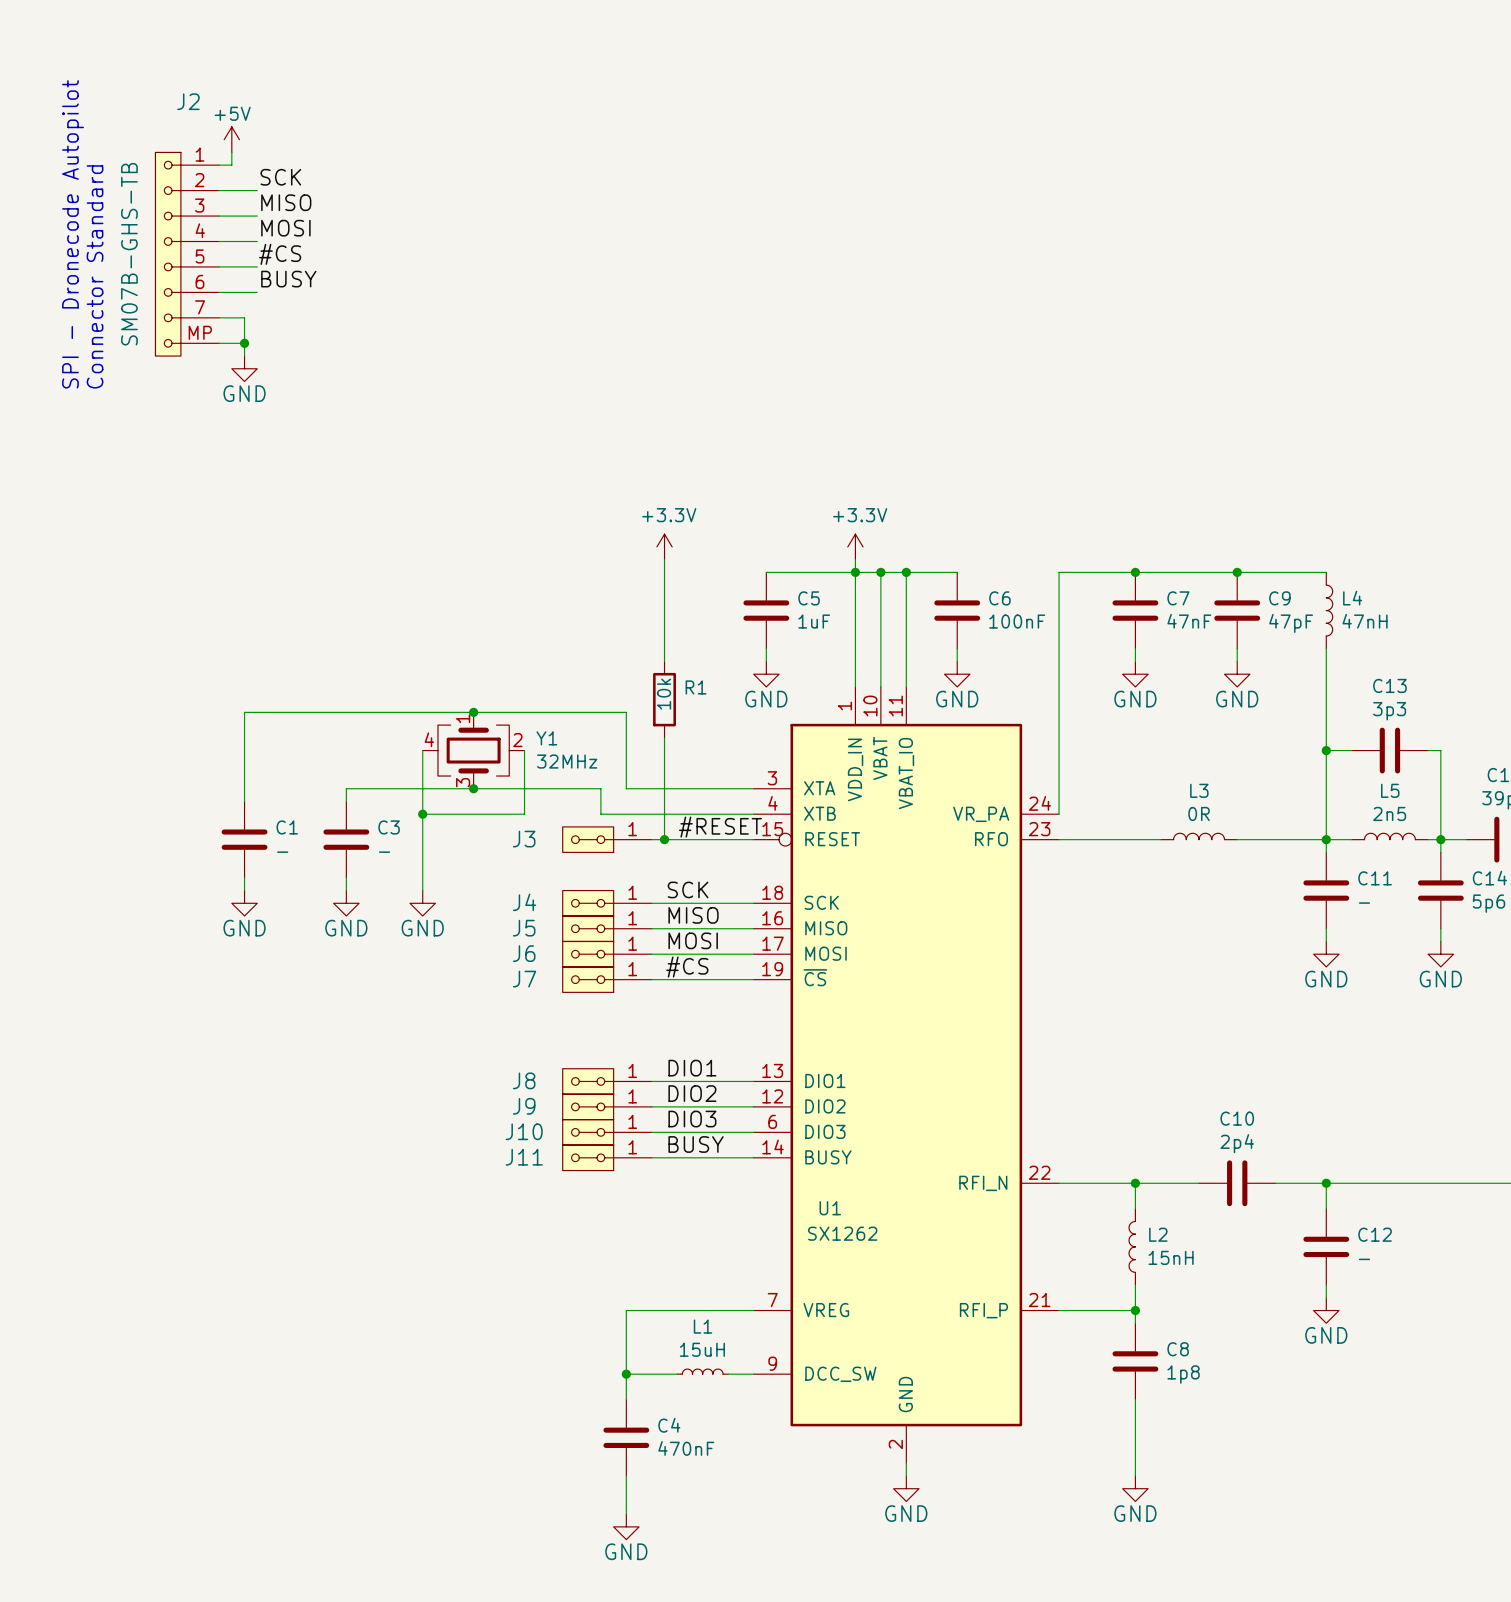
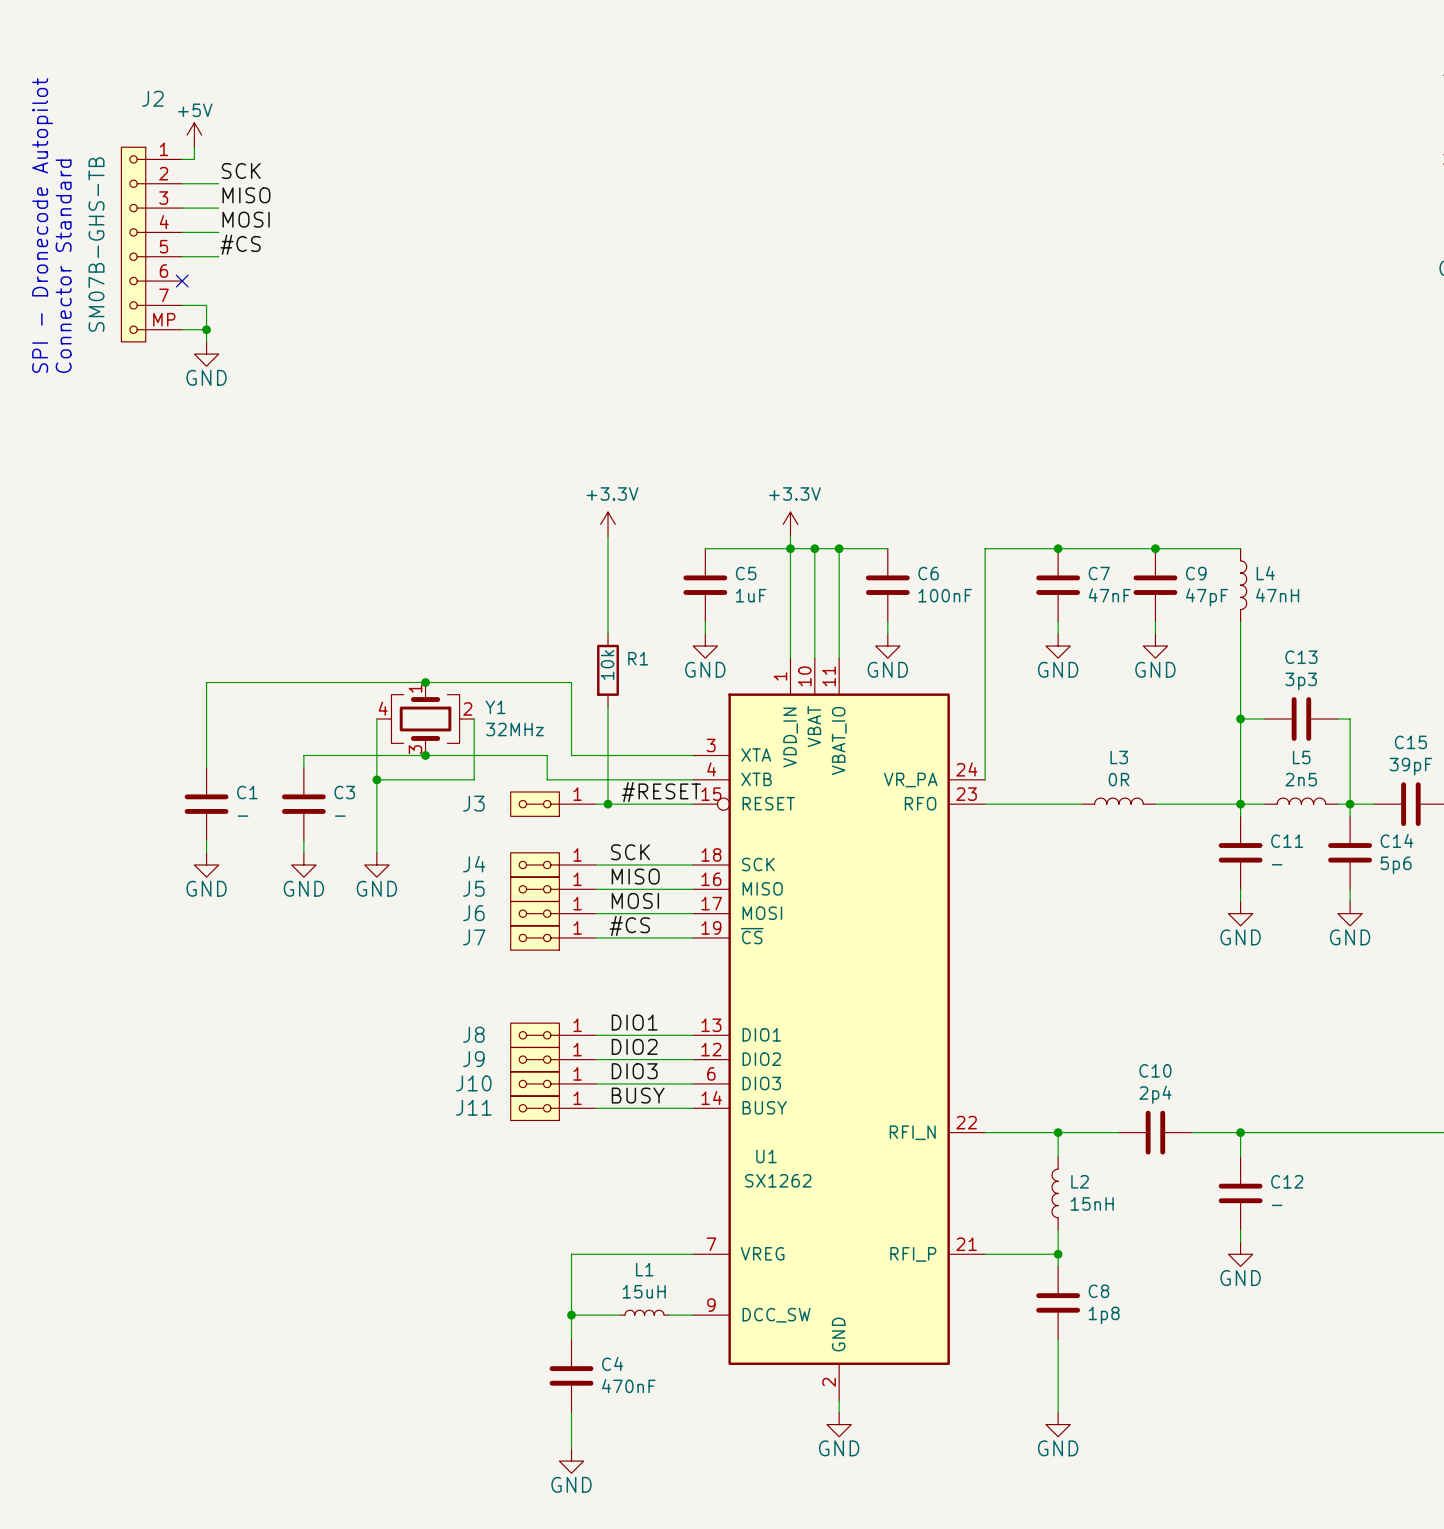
label: BUSY (288, 279) -> none
wire: (219, 292) (257, 292) -> none
no-connect mark: none -> (182, 281)

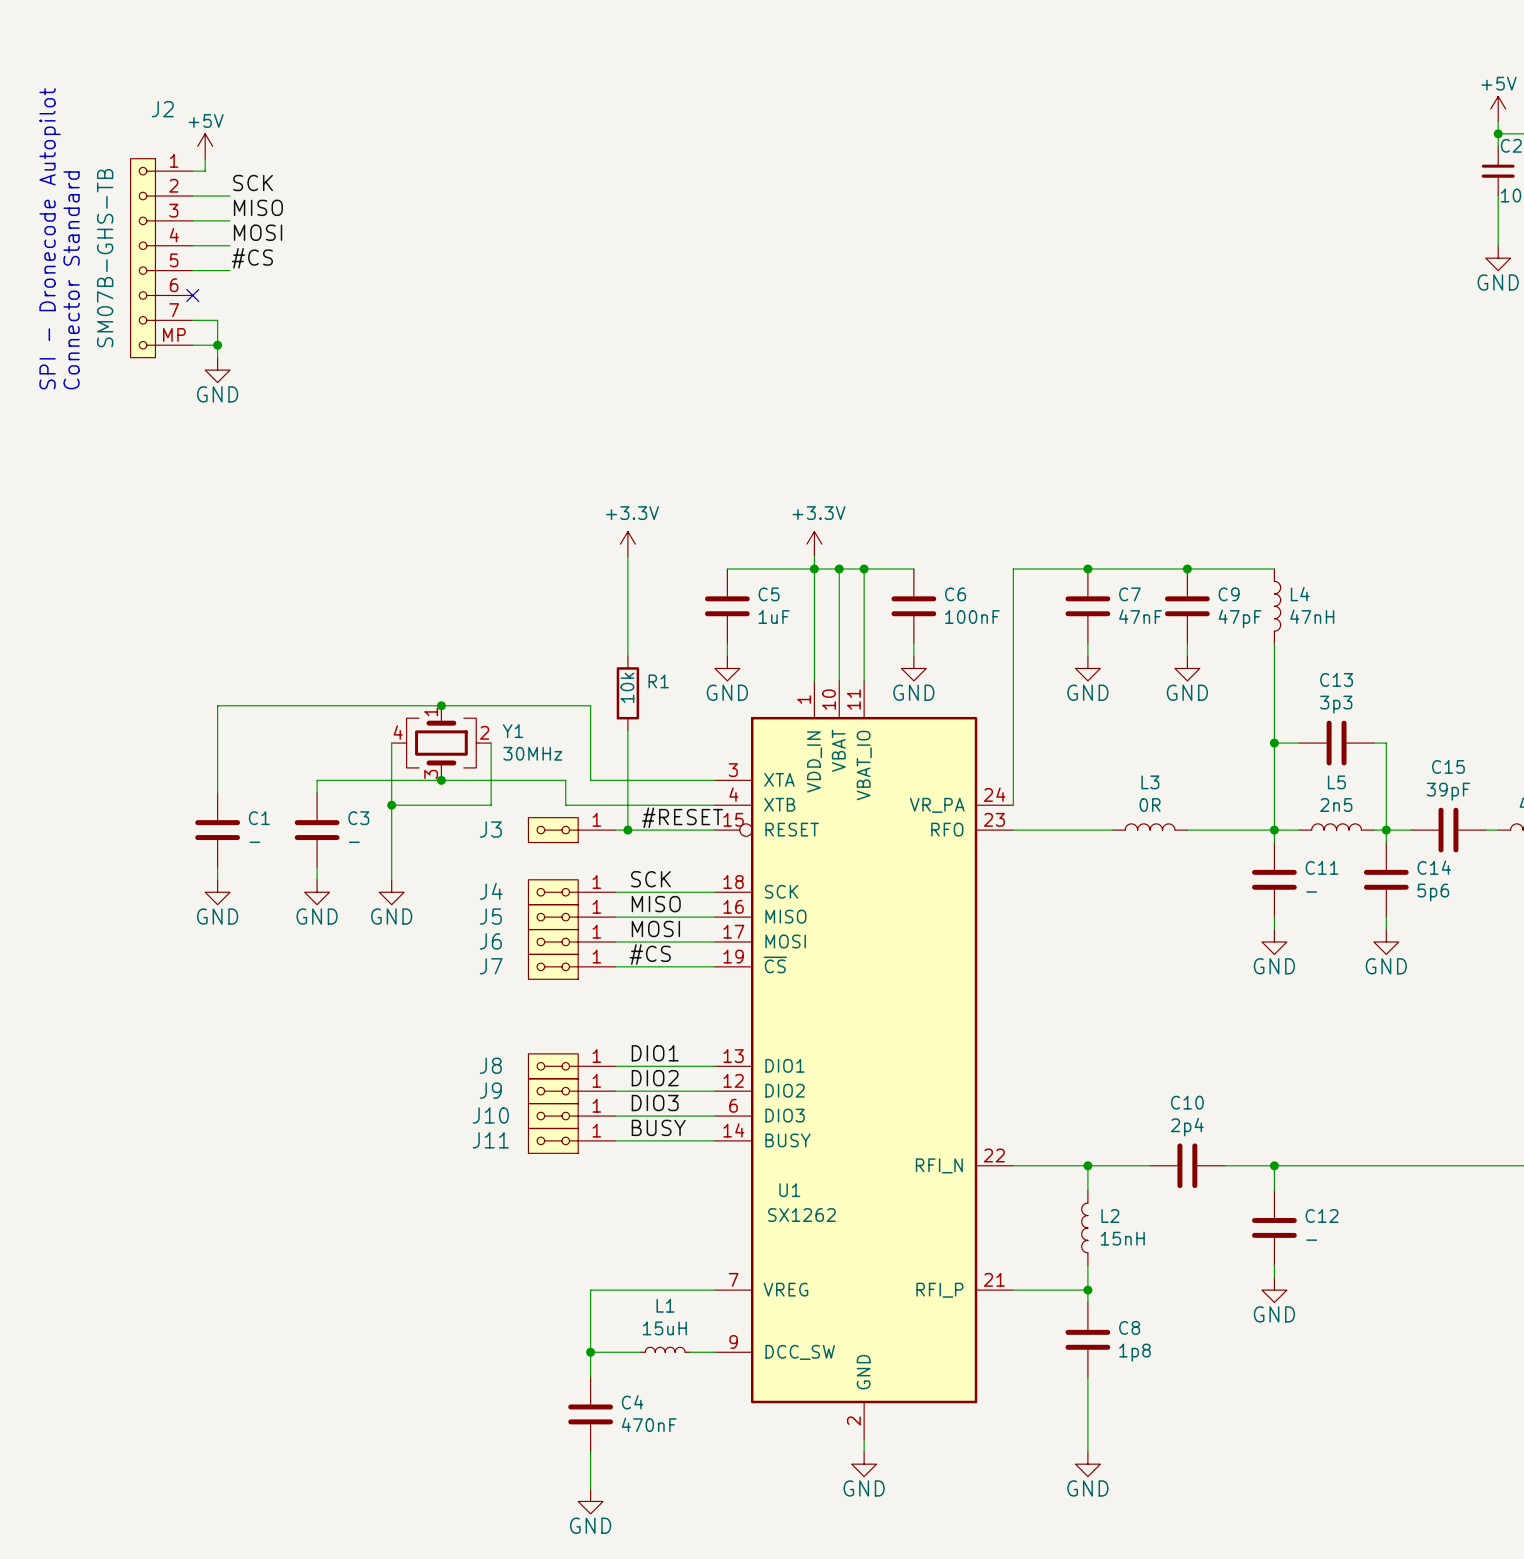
Y1 value: 32MHz (514, 729) -> 30MHz (532, 753)

